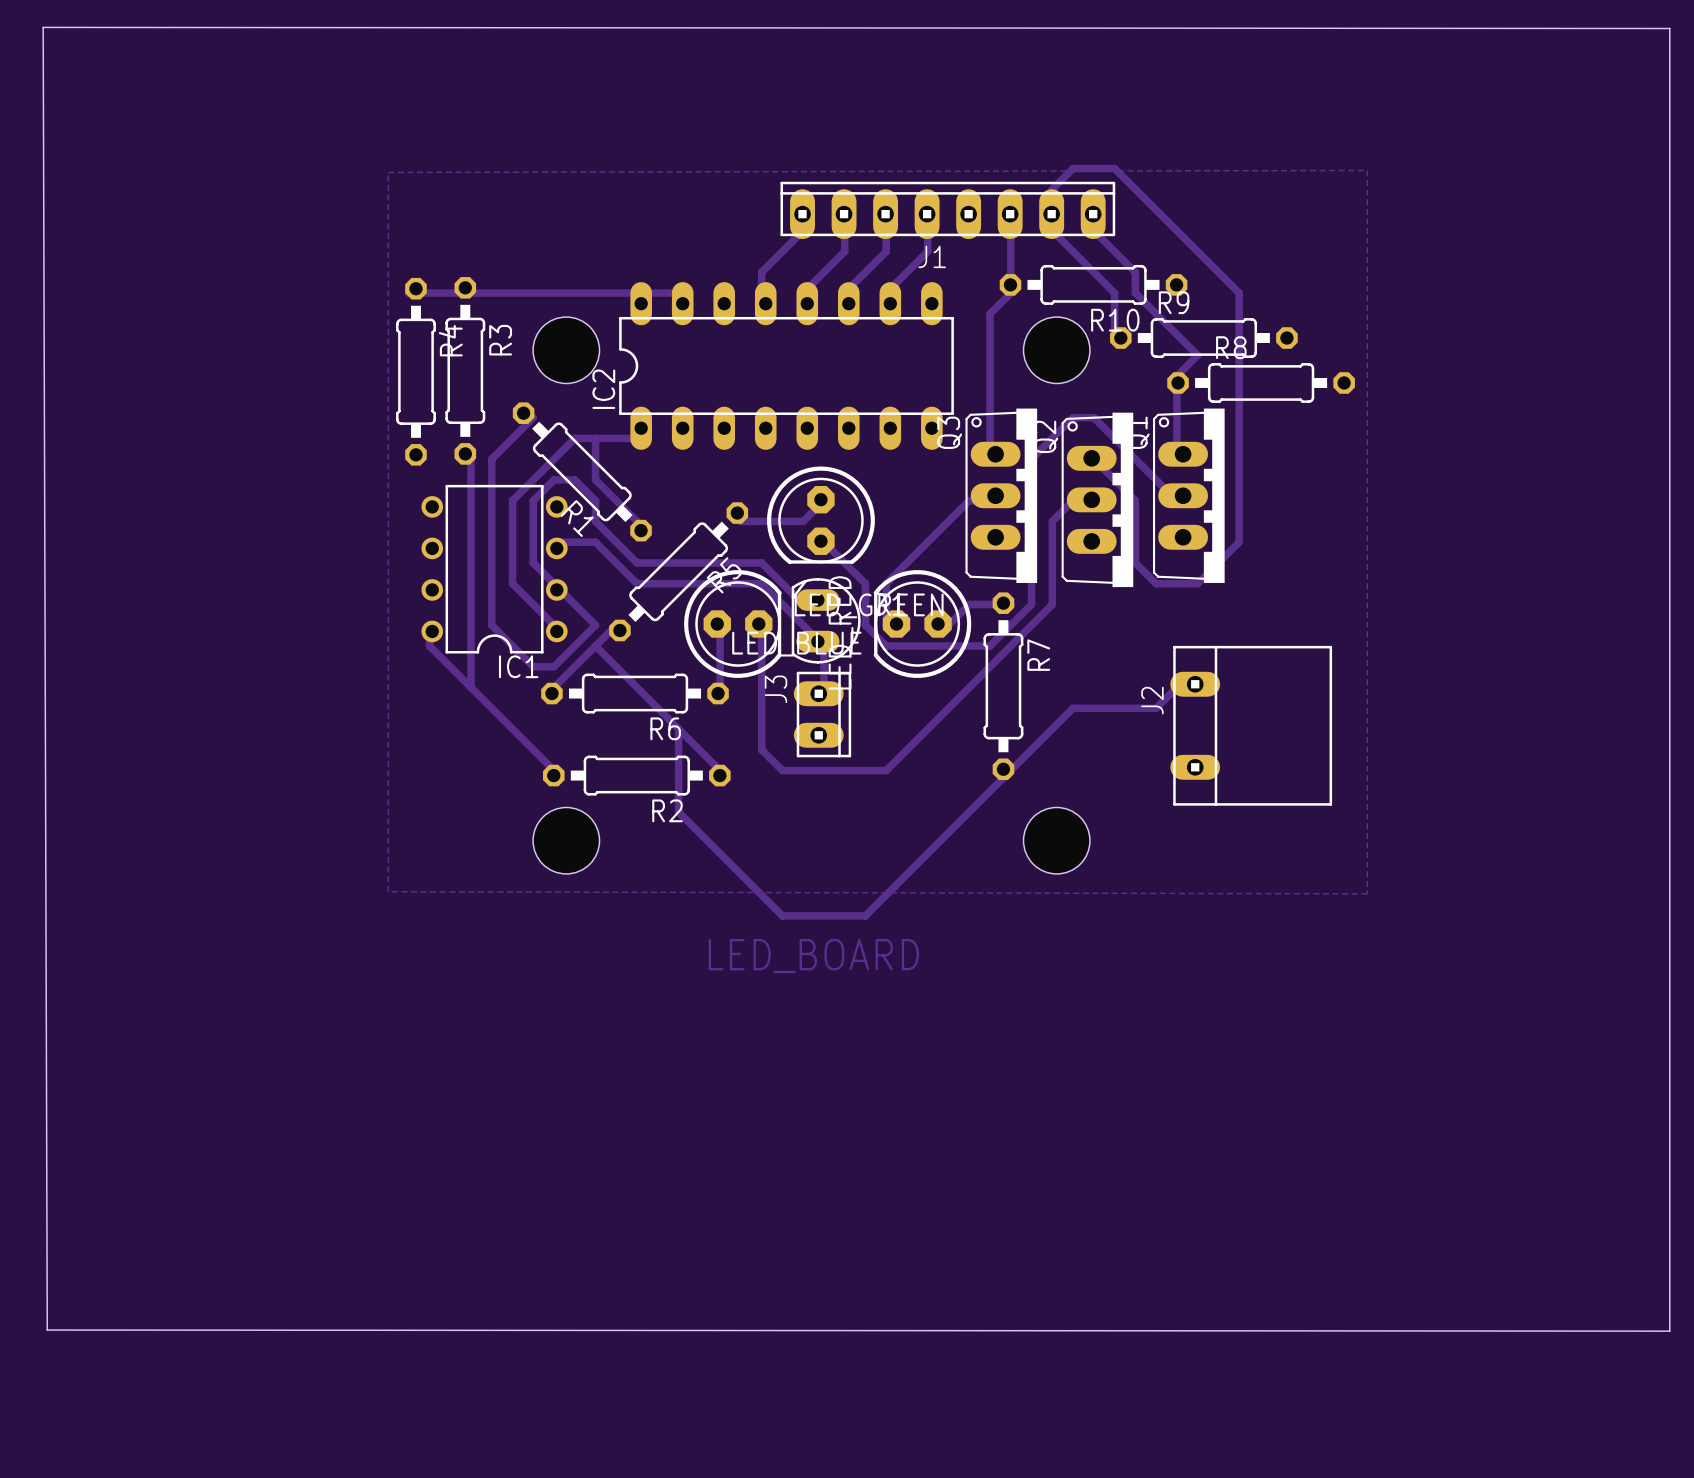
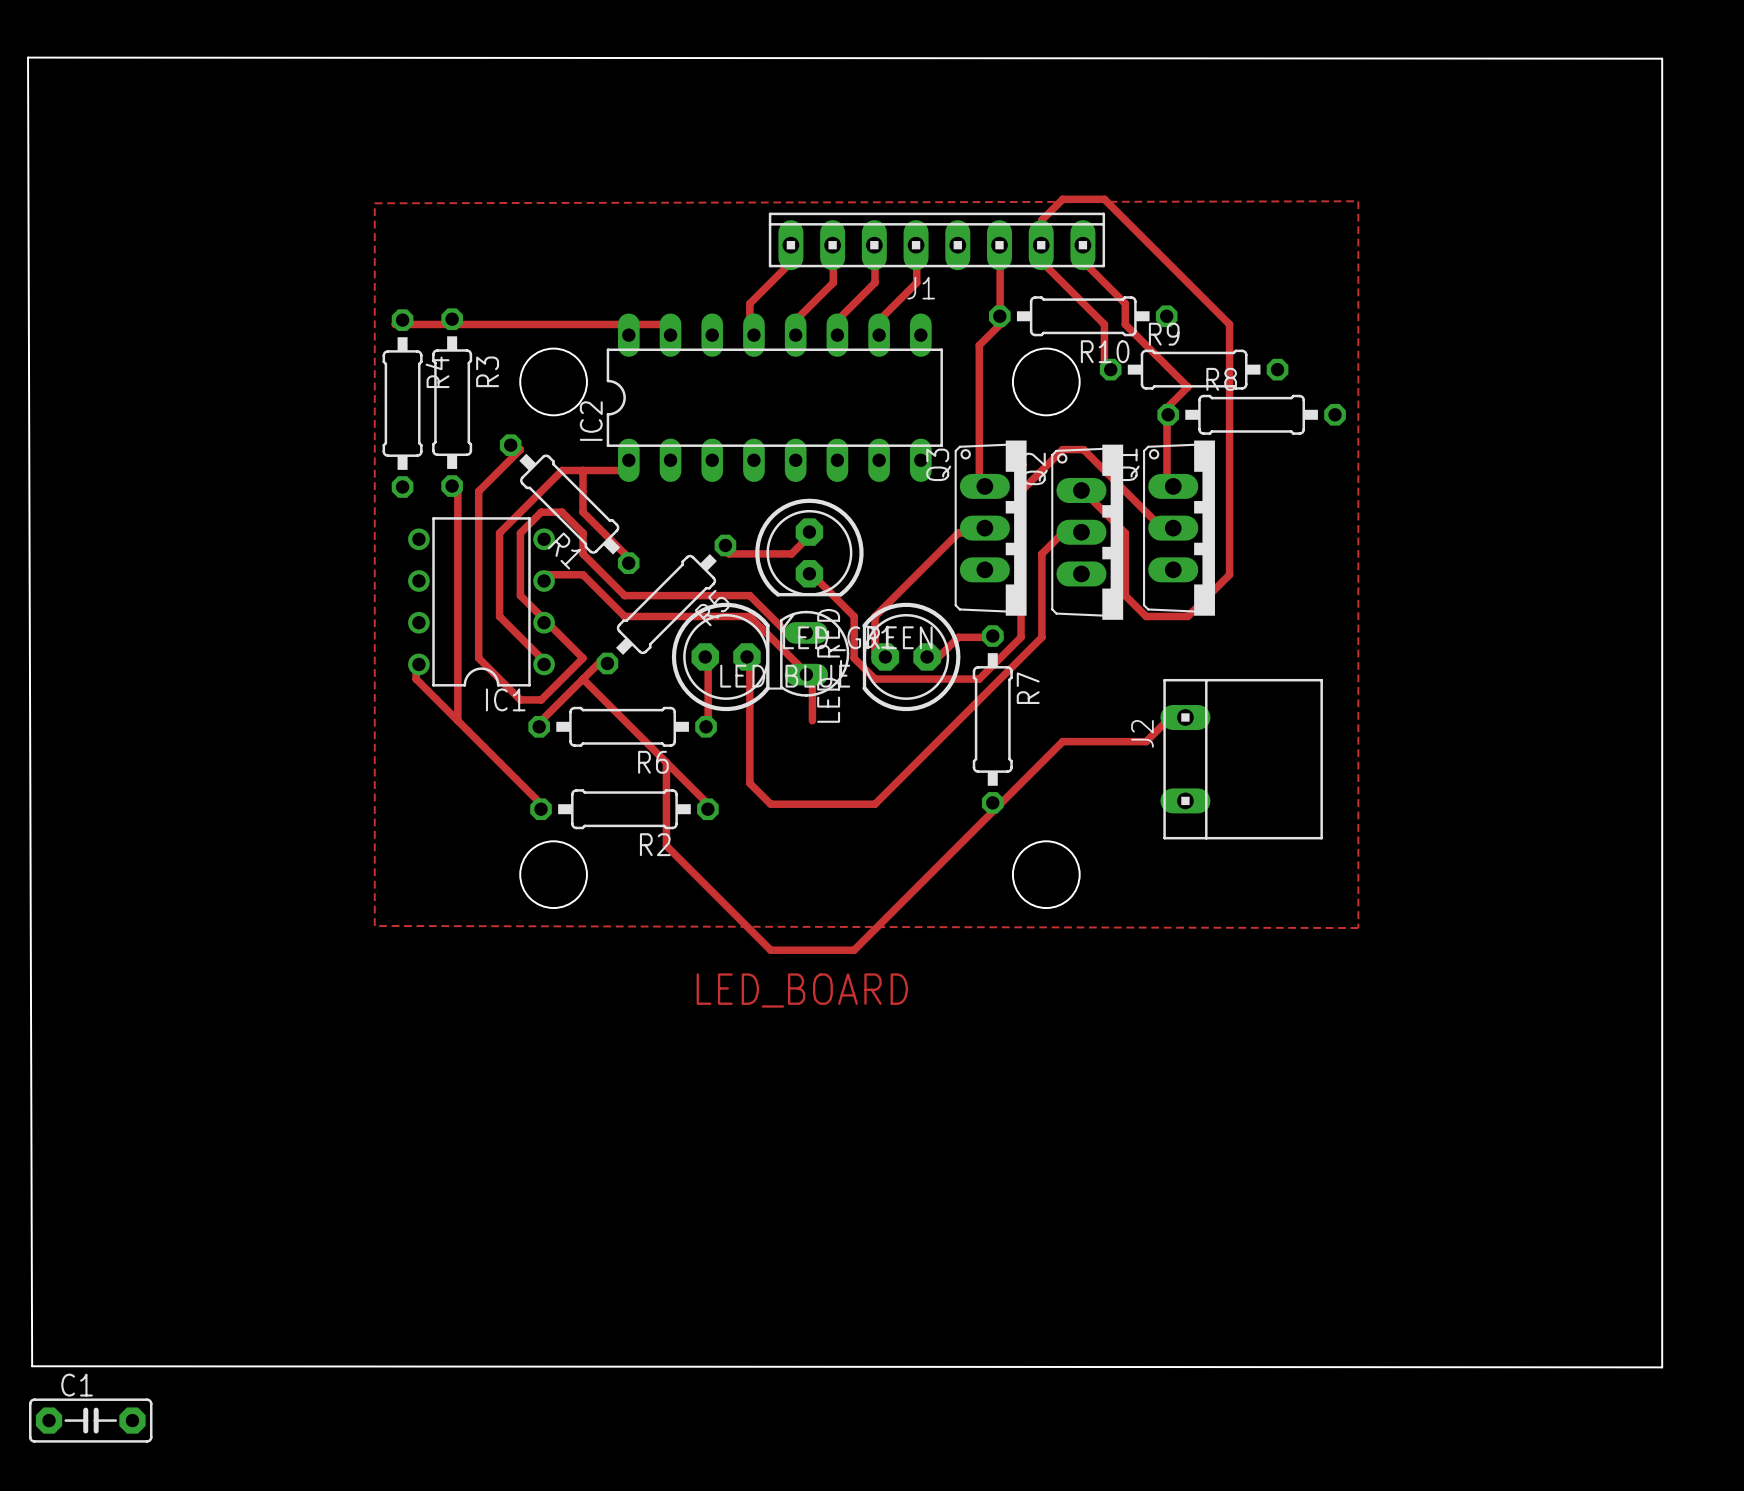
J3: (822, 714) -> none
C1: none -> (90, 1420)

